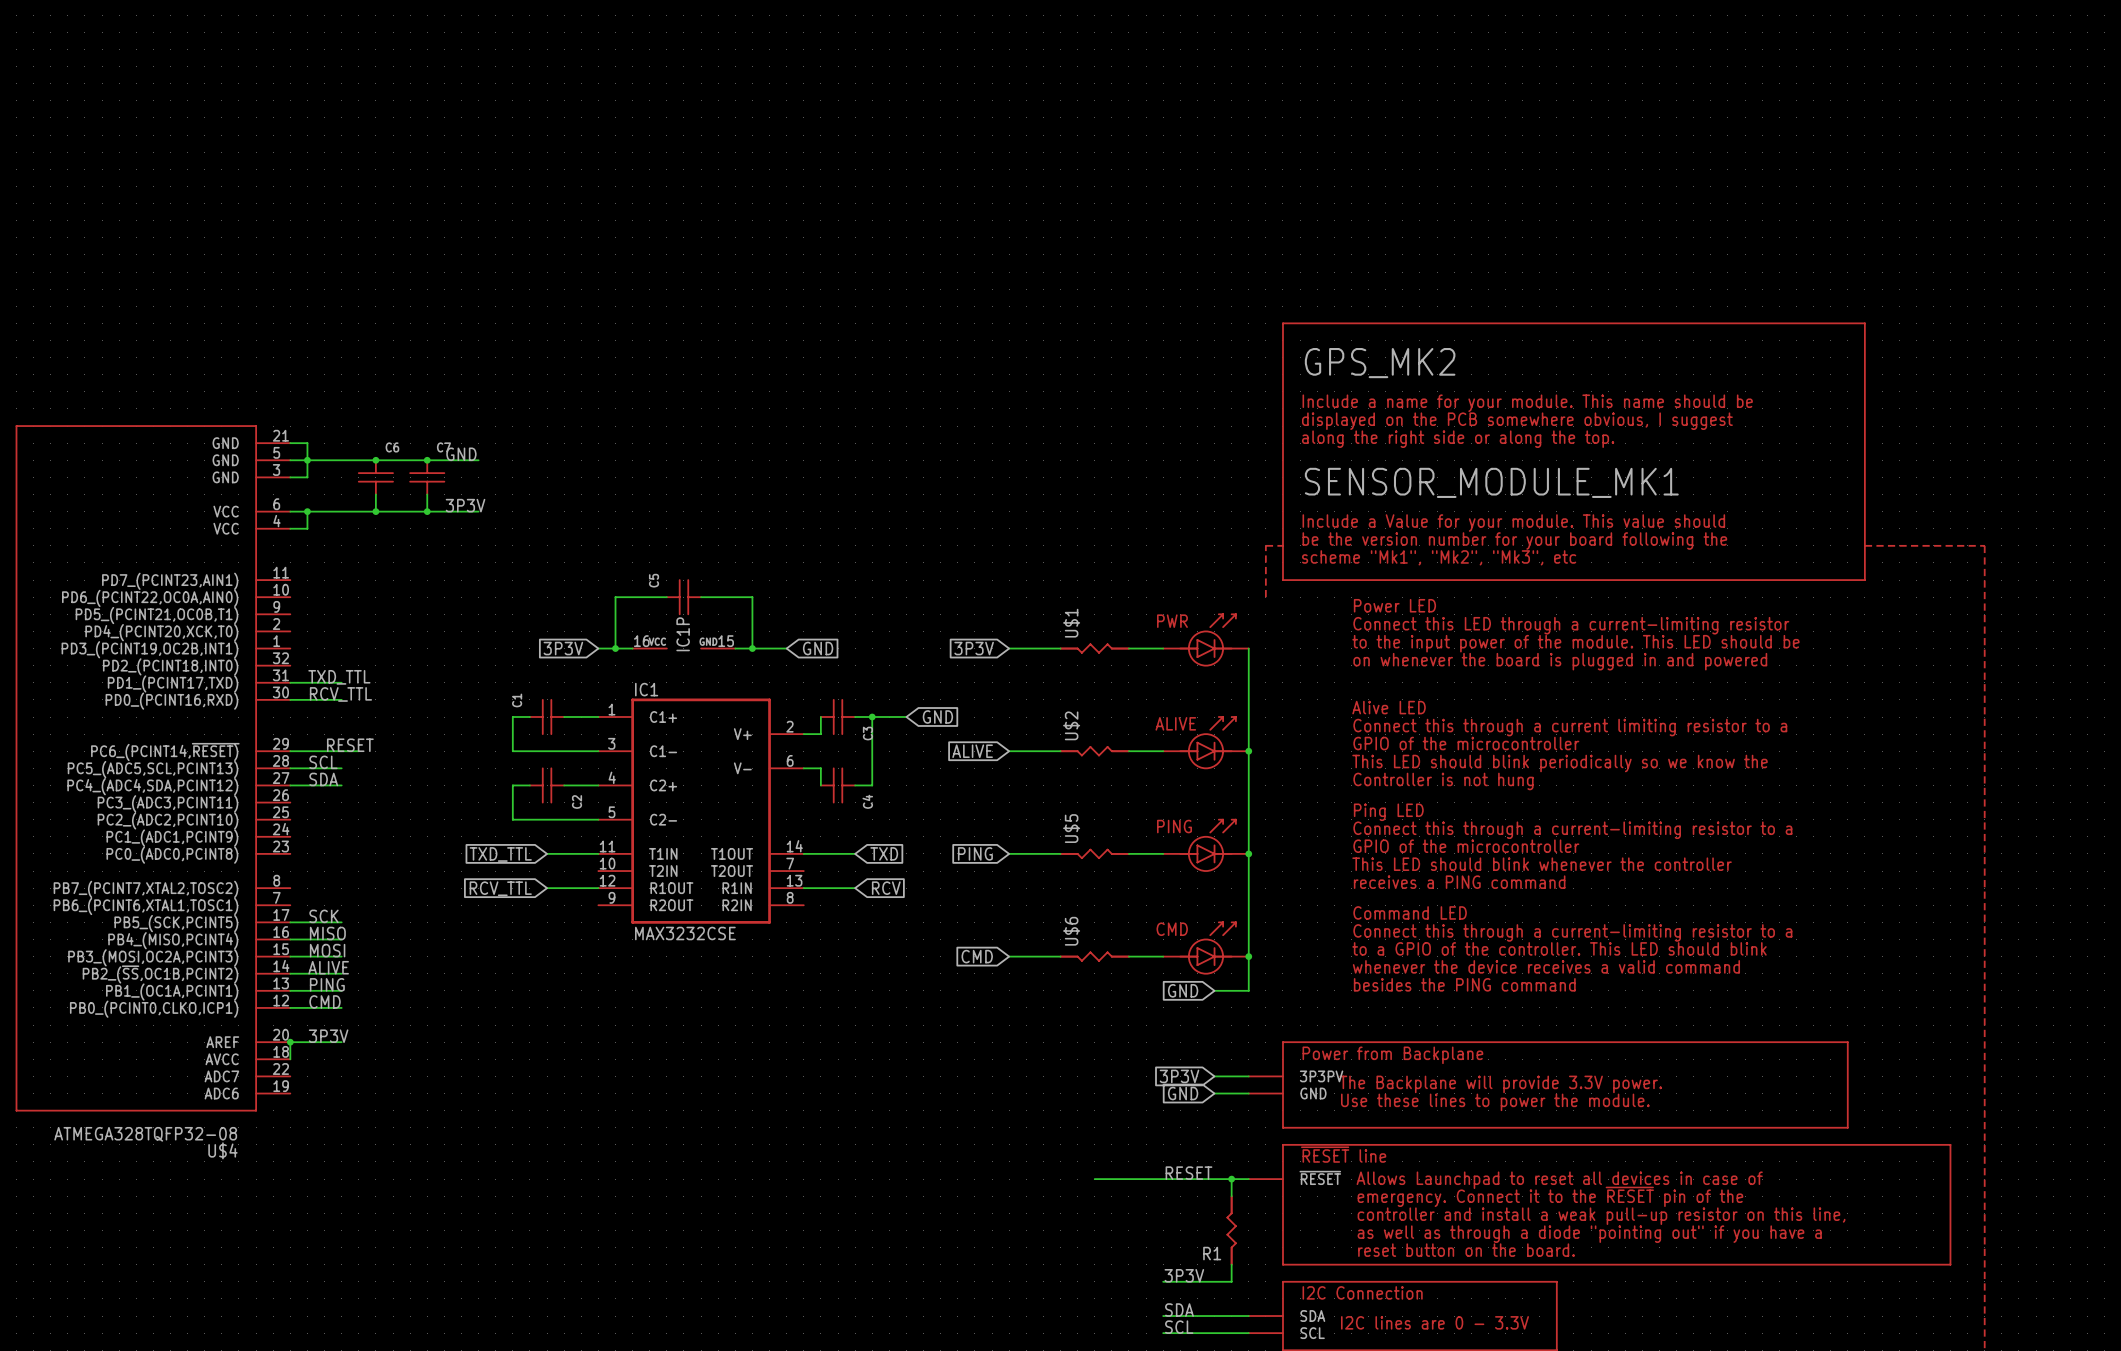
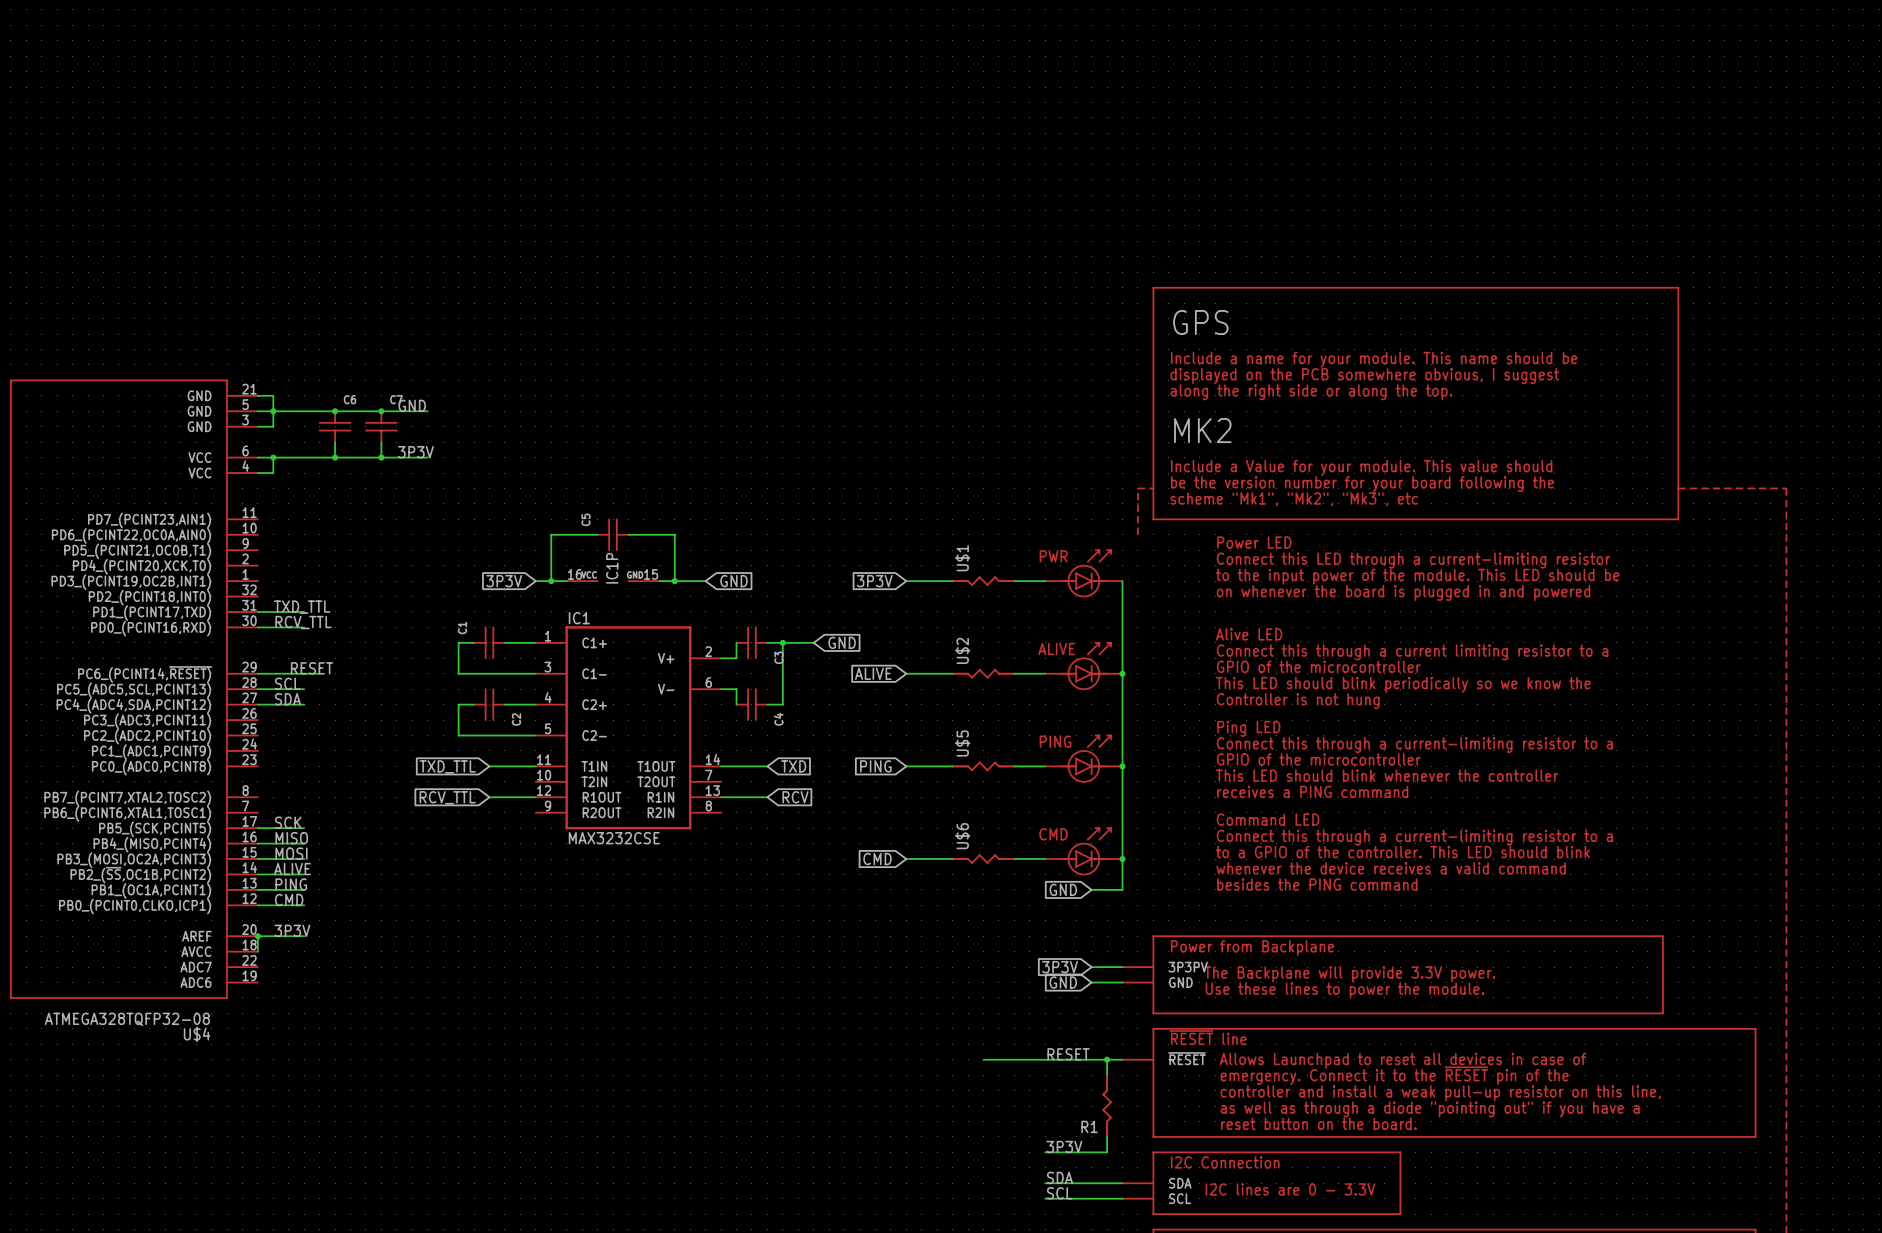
GPS_MK2 name: GPS_MK2 (1380, 363) -> GPS (1200, 322)
GPS_MK2 value: SENSOR_MODULE_MK1 (1491, 482) -> MK2 (1202, 430)

